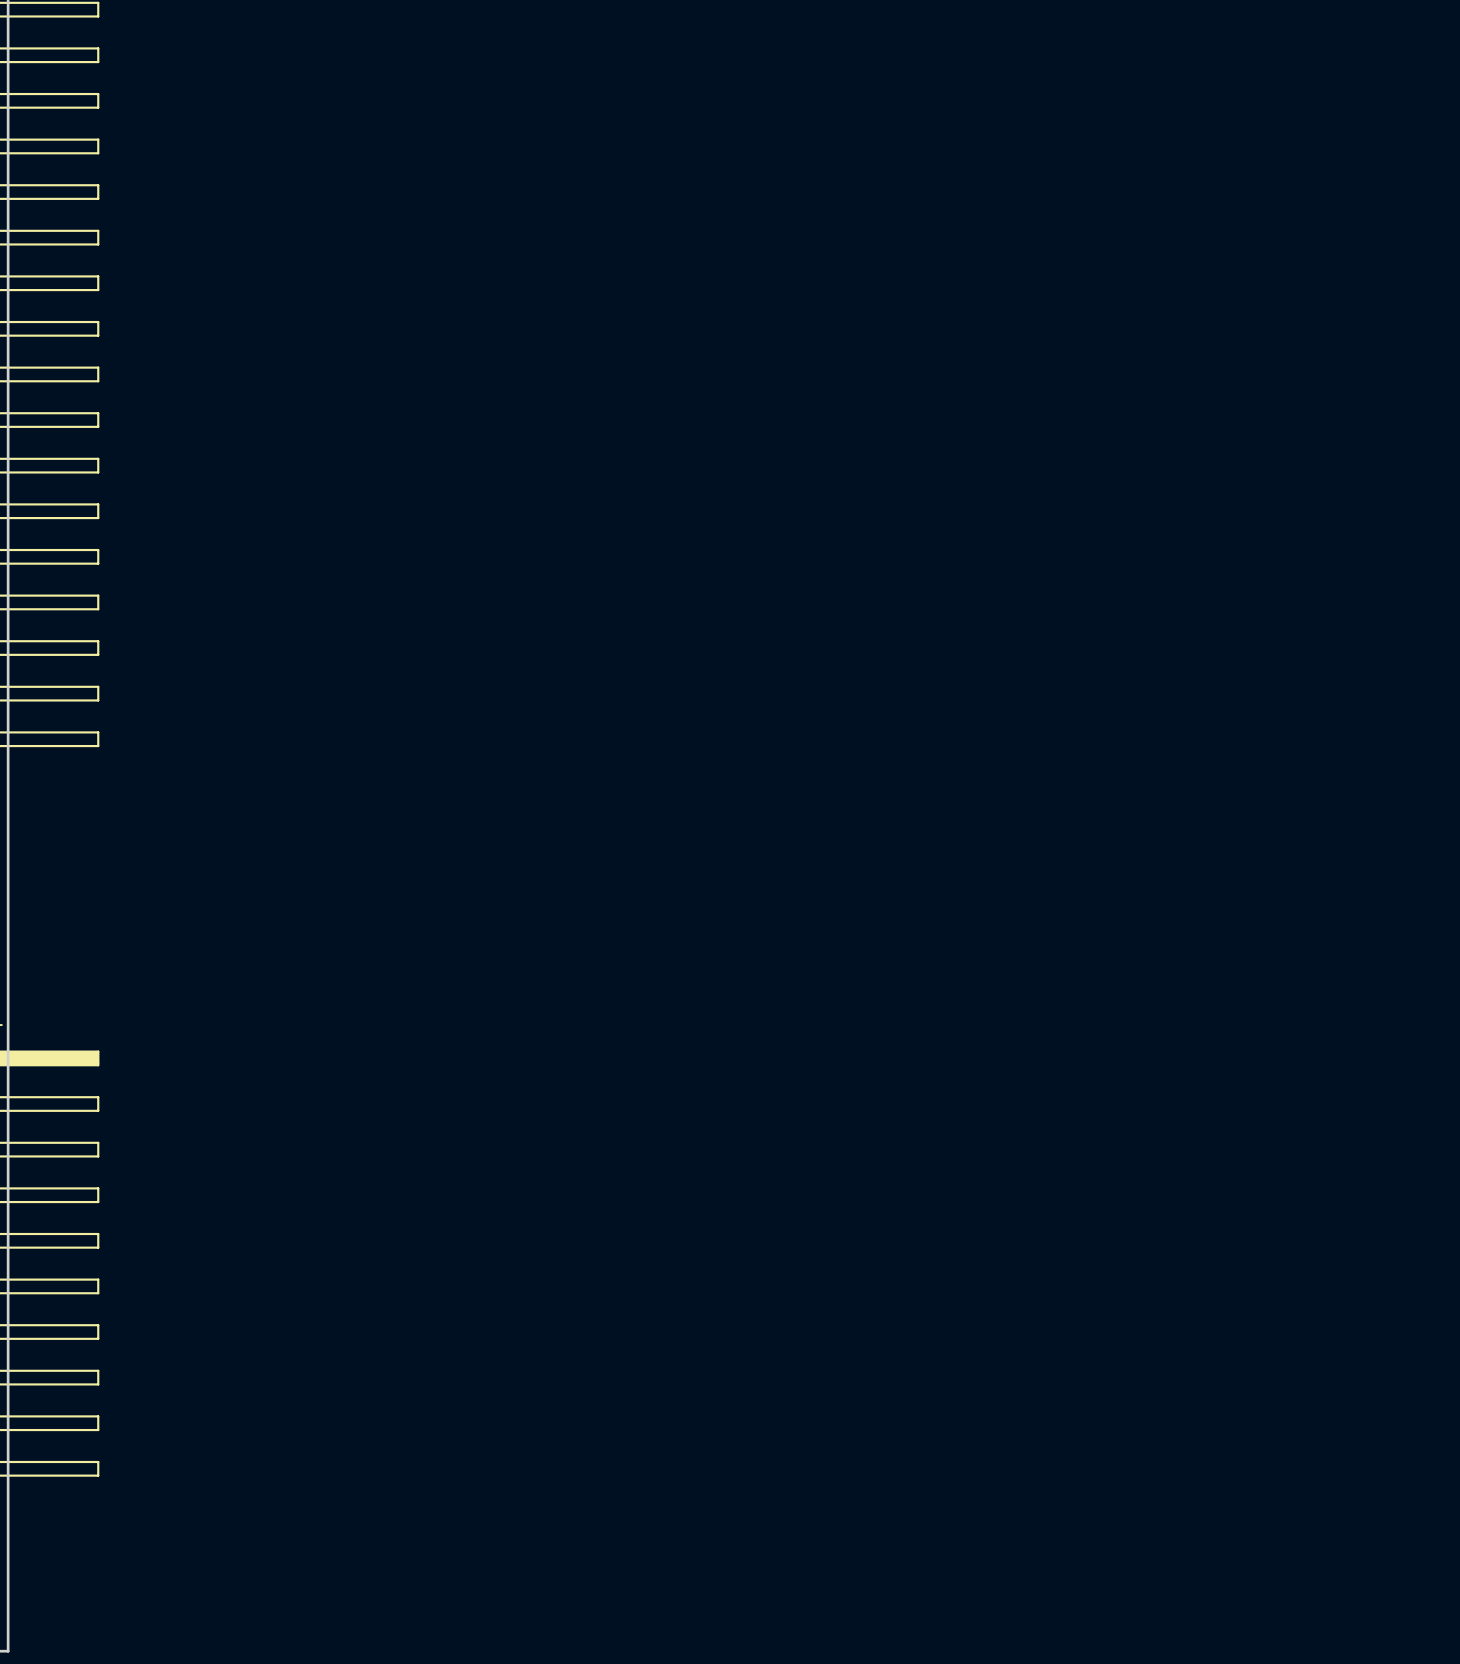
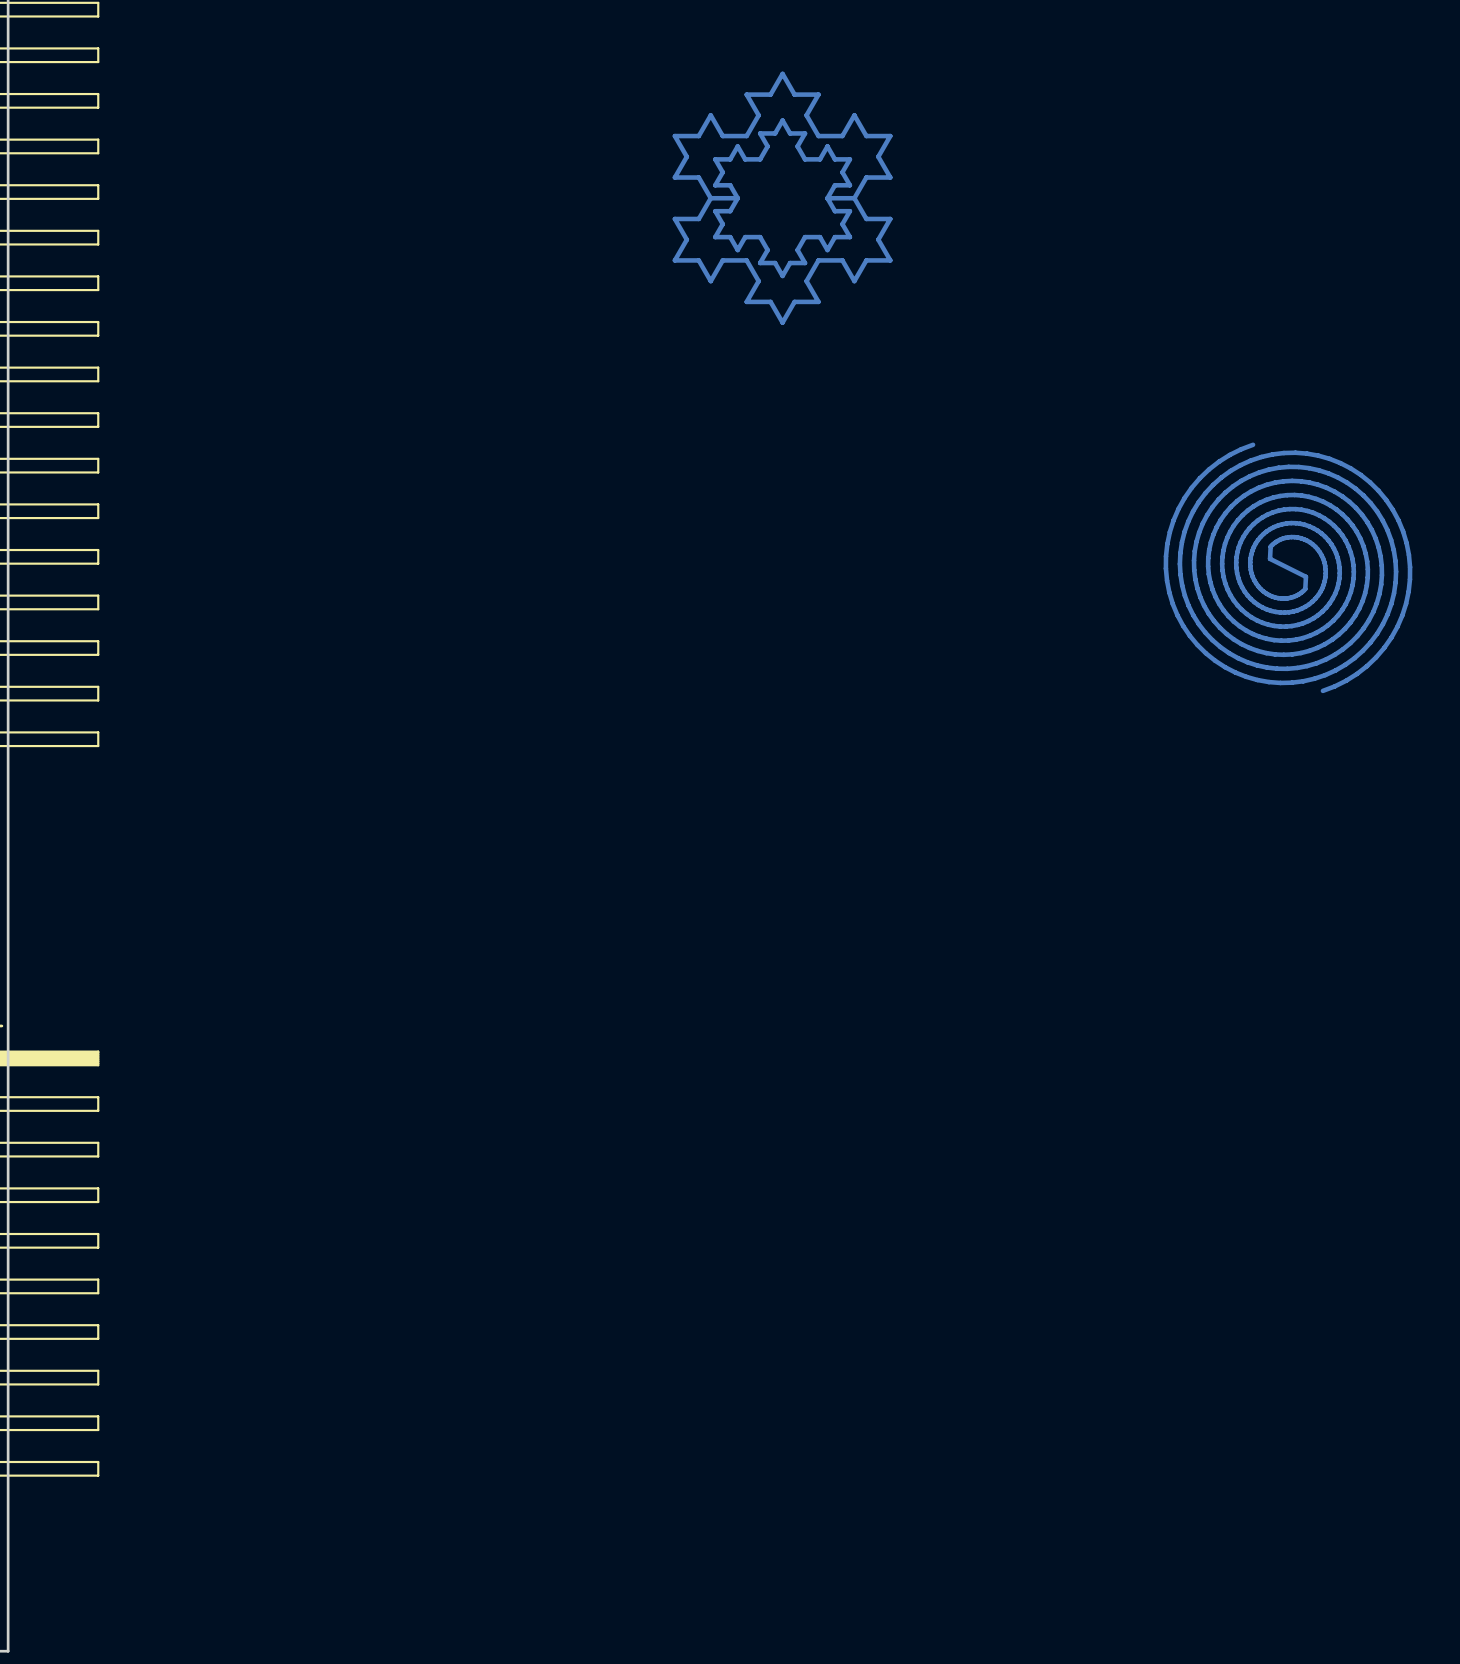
bottom track: none -> (710, 198) (698, 177) (674, 177) (686, 156) (674, 136) (698, 136) (710, 115) (722, 136) (746, 136) (758, 115) (746, 94) (770, 94) (782, 73) (794, 94) (818, 94) (806, 115) (818, 136) (842, 136) (854, 115) (866, 136) (890, 136) (878, 156) (890, 177) (866, 177) (854, 198)
bottom track: none -> (710, 198) (698, 218) (674, 218) (686, 239) (674, 260) (698, 260) (710, 281) (722, 260) (746, 260) (758, 281) (746, 301) (770, 301) (782, 322) (794, 301) (818, 301) (806, 281) (818, 260) (842, 260) (854, 281) (866, 260) (890, 260) (878, 239) (890, 218) (866, 218) (854, 198)
bottom track: none -> (710, 198) (737, 198)
bottom track: none -> (737, 198) (730, 185) (715, 185) (722, 172) (715, 159) (730, 159) (737, 146) (745, 159) (760, 159) (767, 146) (760, 133) (775, 133) (782, 120) (790, 133) (805, 133) (797, 146) (805, 159) (820, 159) (827, 146) (834, 159) (849, 159) (842, 172) (849, 185) (834, 185) (827, 198)
bottom track: none -> (737, 198) (730, 211) (715, 211) (722, 224) (715, 237) (730, 237) (737, 250) (745, 237) (760, 237) (767, 250) (760, 263) (775, 263) (782, 275) (790, 263) (805, 263) (797, 250) (805, 237) (820, 237) (827, 250) (834, 237) (849, 237) (842, 224) (849, 211) (834, 211) (827, 198)
bottom track: none -> (827, 198) (854, 198)
bottom track: none -> (1253, 444) (1218, 461) (1199, 478) (1184, 497) (1173, 520) (1167, 544) (1165, 568) (1169, 592) (1177, 615) (1189, 635) (1205, 653) (1235, 672) (1257, 680) (1292, 682) (1314, 678) (1345, 664) (1362, 650) (1382, 624) (1391, 603) (1396, 571) (1393, 550) (1382, 520) (1370, 503) (1347, 482) (1328, 473) (1298, 466) (1278, 467) (1249, 476) (1233, 486) (1212, 507) (1202, 523) (1194, 551) (1194, 569) (1200, 597) (1208, 613) (1226, 633) (1241, 644) (1266, 653) (1283, 654) (1309, 650) (1325, 644) (1345, 628) (1355, 615) (1365, 593) (1367, 577) (1365, 553) (1360, 538) (1347, 519) (1336, 509) (1316, 498) (1301, 495) (1280, 496) (1266, 499) (1247, 510) (1237, 520) (1227, 537) (1223, 550) (1222, 570) (1225, 583) (1233, 600) (1241, 609) (1257, 620) (1268, 624) (1286, 626) (1297, 624) (1313, 618) (1322, 611) (1332, 598) (1337, 588) (1339, 573) (1338, 562) (1333, 548) (1321, 533) (1300, 523) (1278, 525) (1260, 536) (1252, 550) (1250, 569) (1258, 586) (1271, 596) (1290, 597) (1305, 589) (1305, 576) (1270, 558) (1270, 546) (1277, 541) (1291, 537) (1307, 540) (1319, 552) (1325, 565) (1323, 584) (1312, 601) (1293, 611) (1275, 611) (1254, 602) (1239, 582) (1236, 567) (1236, 557) (1243, 537) (1253, 524) (1262, 517) (1278, 510) (1289, 509) (1307, 510) (1318, 515) (1334, 525) (1342, 535) (1350, 552) (1353, 565) (1352, 585) (1348, 597) (1338, 615) (1328, 625) (1309, 635) (1295, 639) (1274, 640) (1259, 636) (1239, 626) (1228, 616) (1215, 596) (1210, 582) (1208, 558) (1210, 542) (1220, 519) (1230, 506) (1250, 491) (1266, 484) (1292, 480) (1309, 482) (1334, 491) (1349, 501) (1367, 522) (1375, 538) (1381, 565) (1381, 584) (1373, 611) (1363, 628) (1342, 649) (1326, 659) (1297, 667) (1277, 668) (1247, 662) (1228, 653) (1205, 632) (1193, 615) (1182, 585) (1179, 563) (1184, 531) (1198, 502) (1221, 477) (1240, 465) (1272, 454) (1295, 452) (1329, 458) (1350, 468) (1378, 490) (1398, 520) (1408, 555) (1408, 591) (1397, 626) (1376, 657) (1346, 680) (1322, 690)

